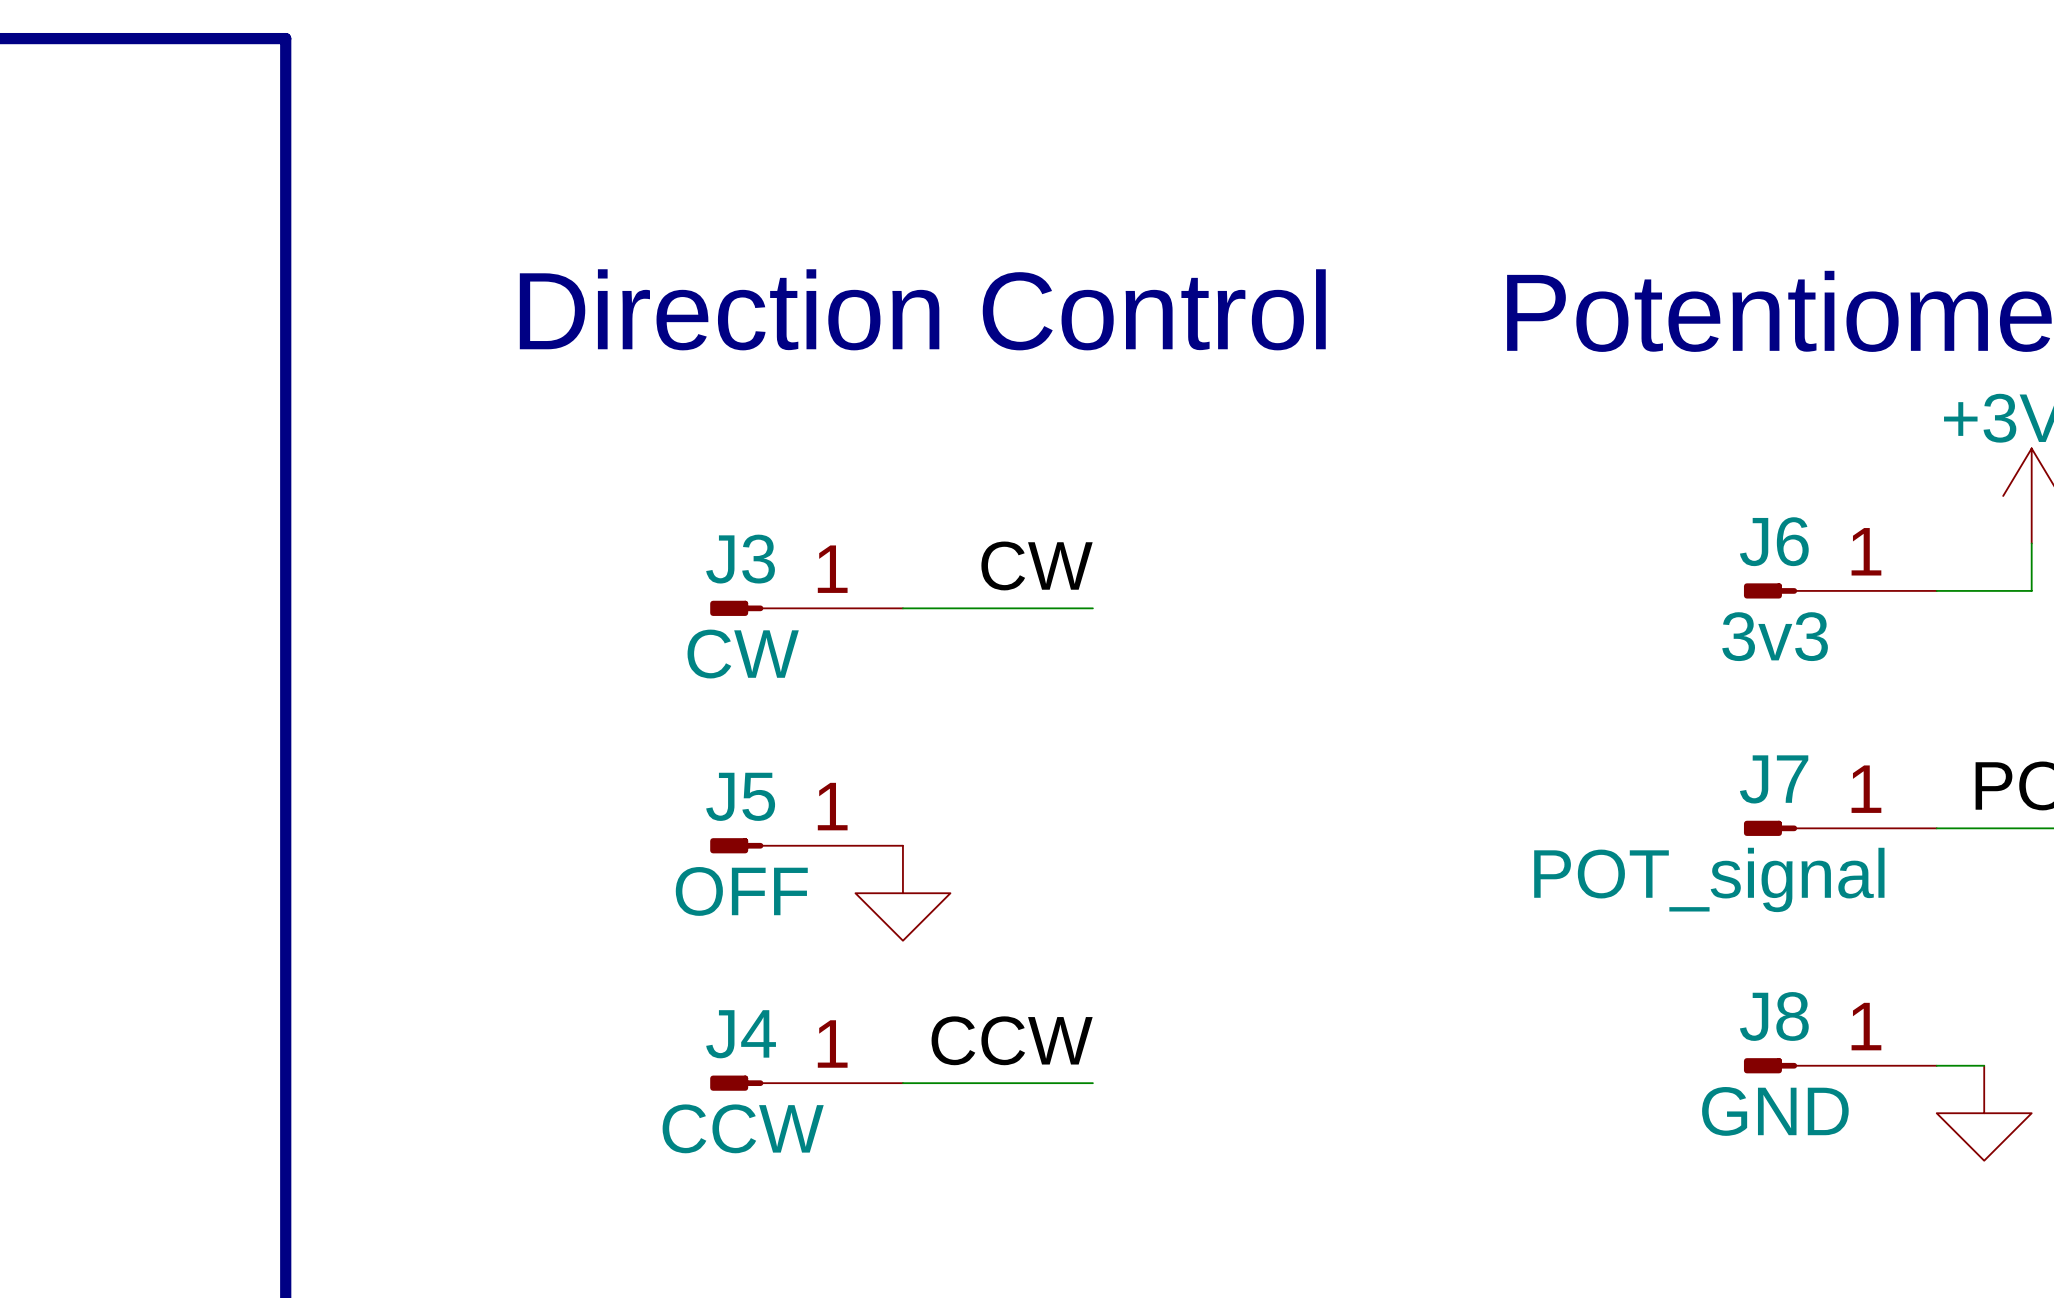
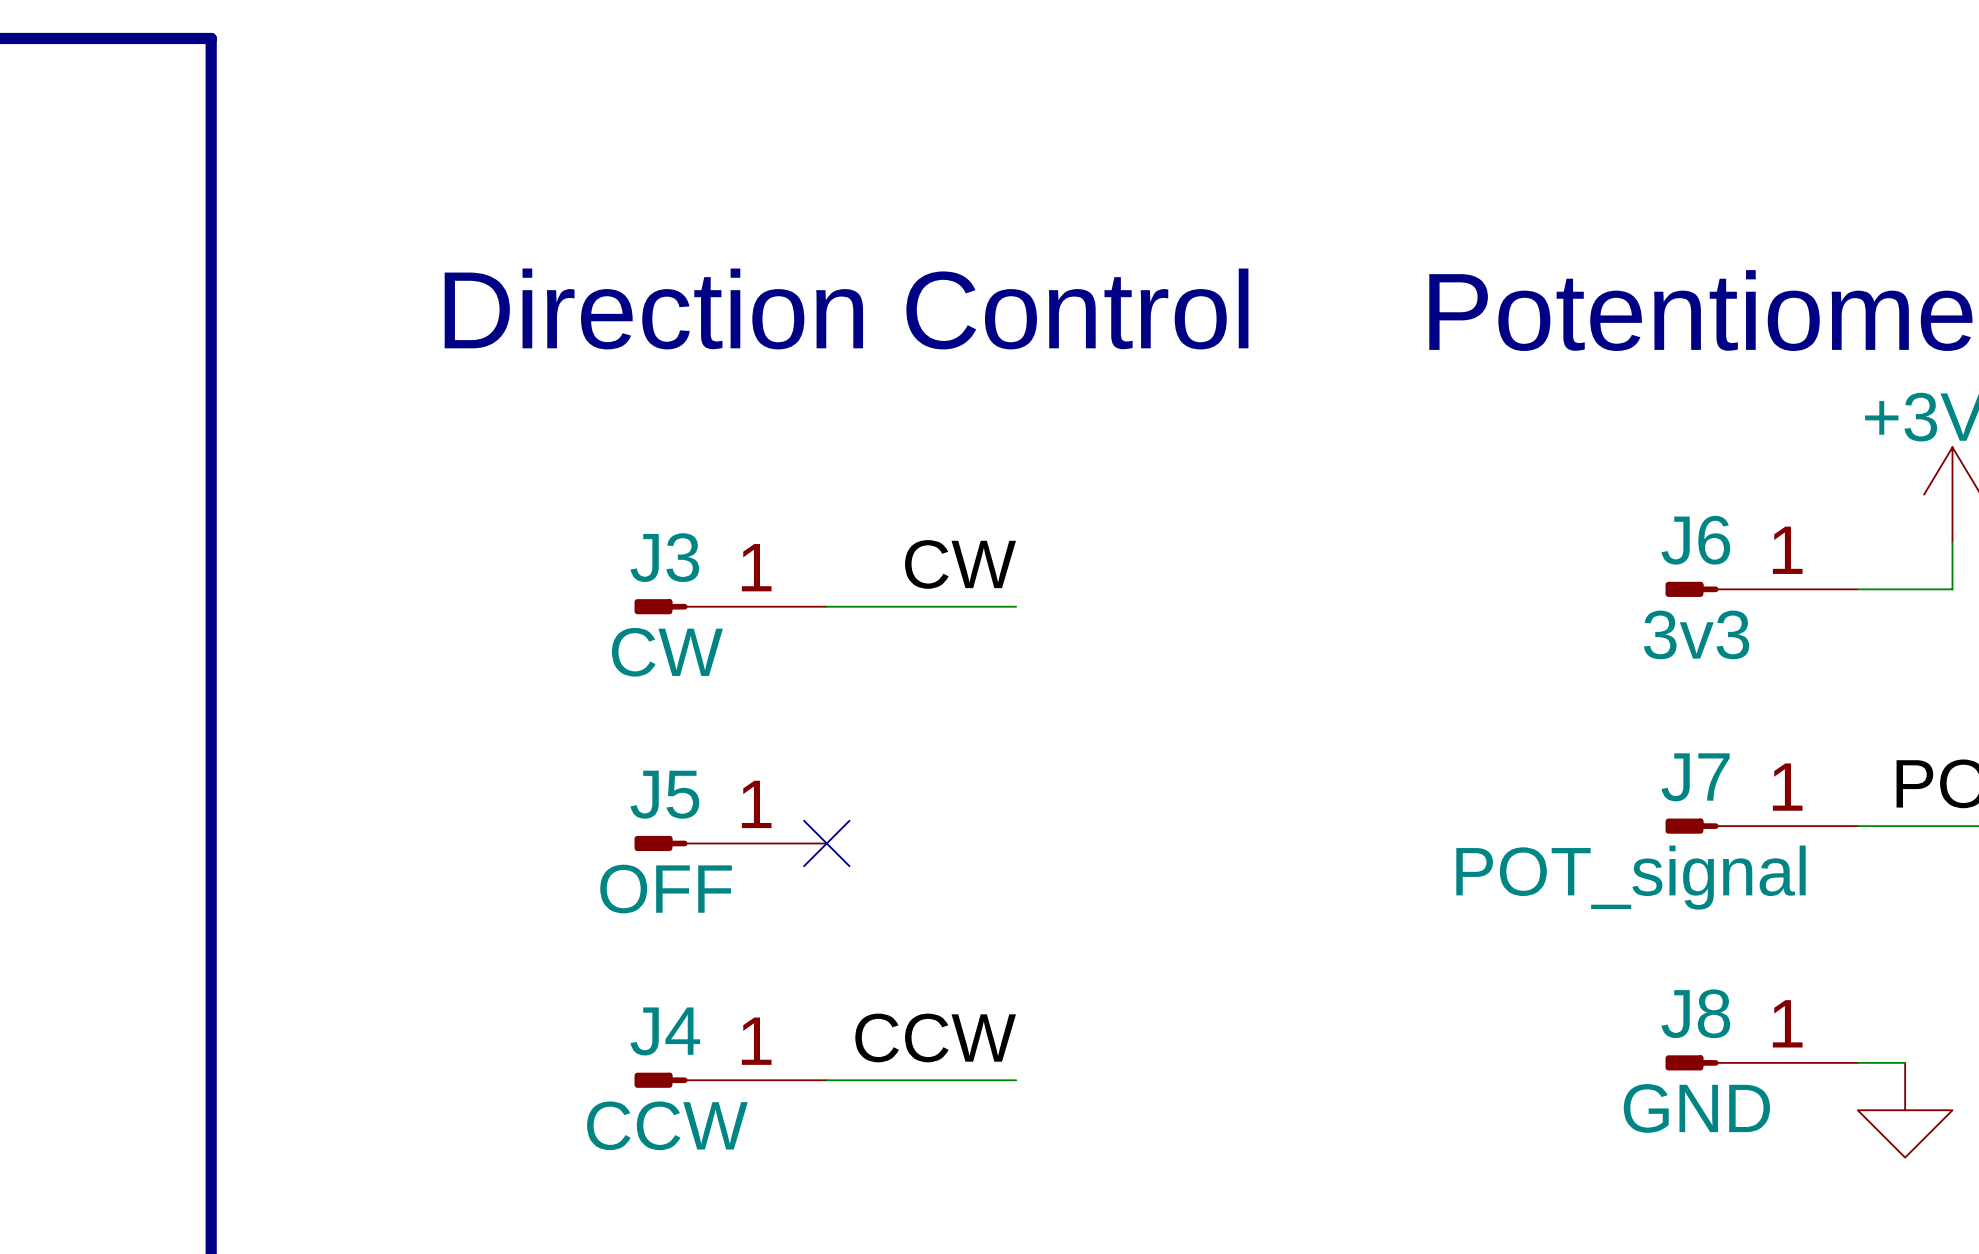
no-connect mark: none -> (826, 843)
power symbol: (902, 893) -> none

